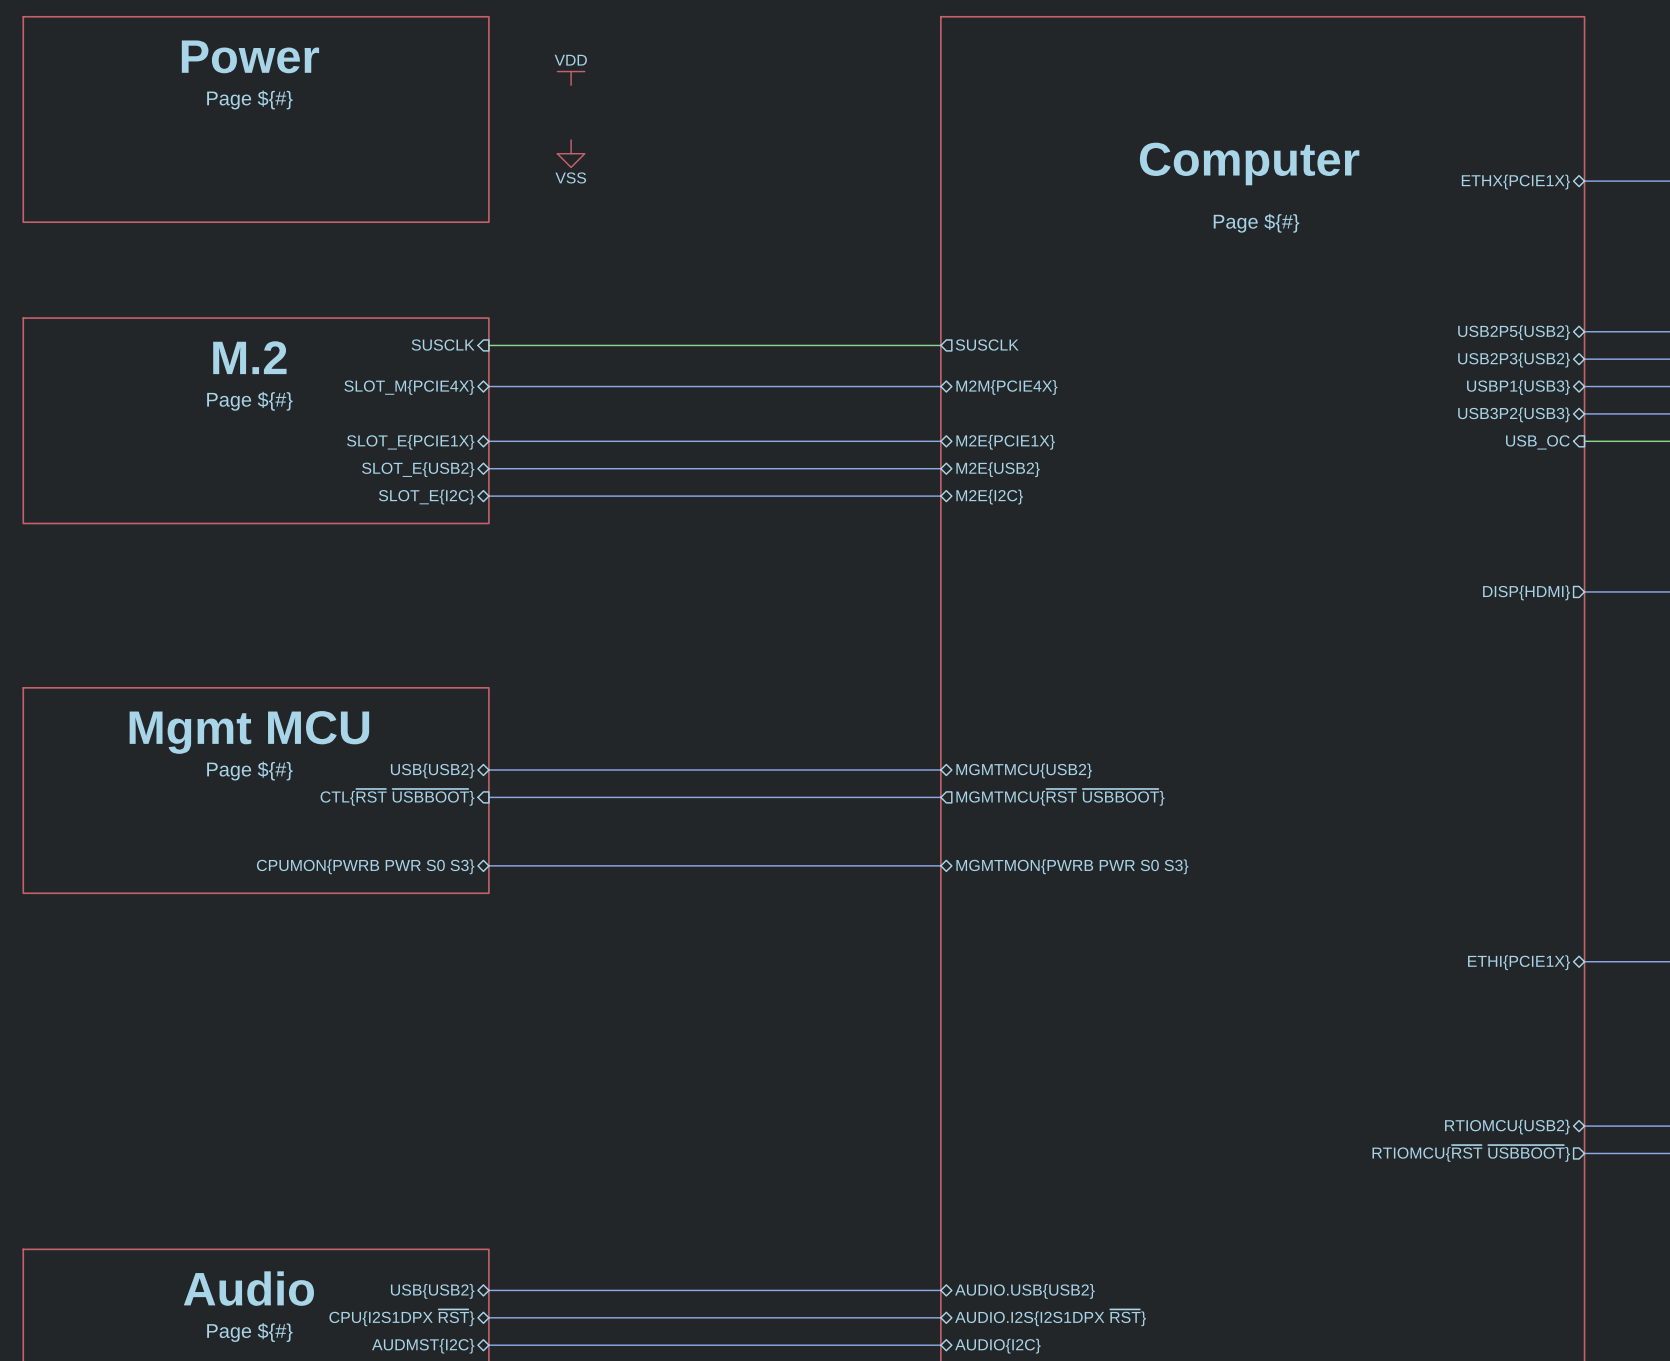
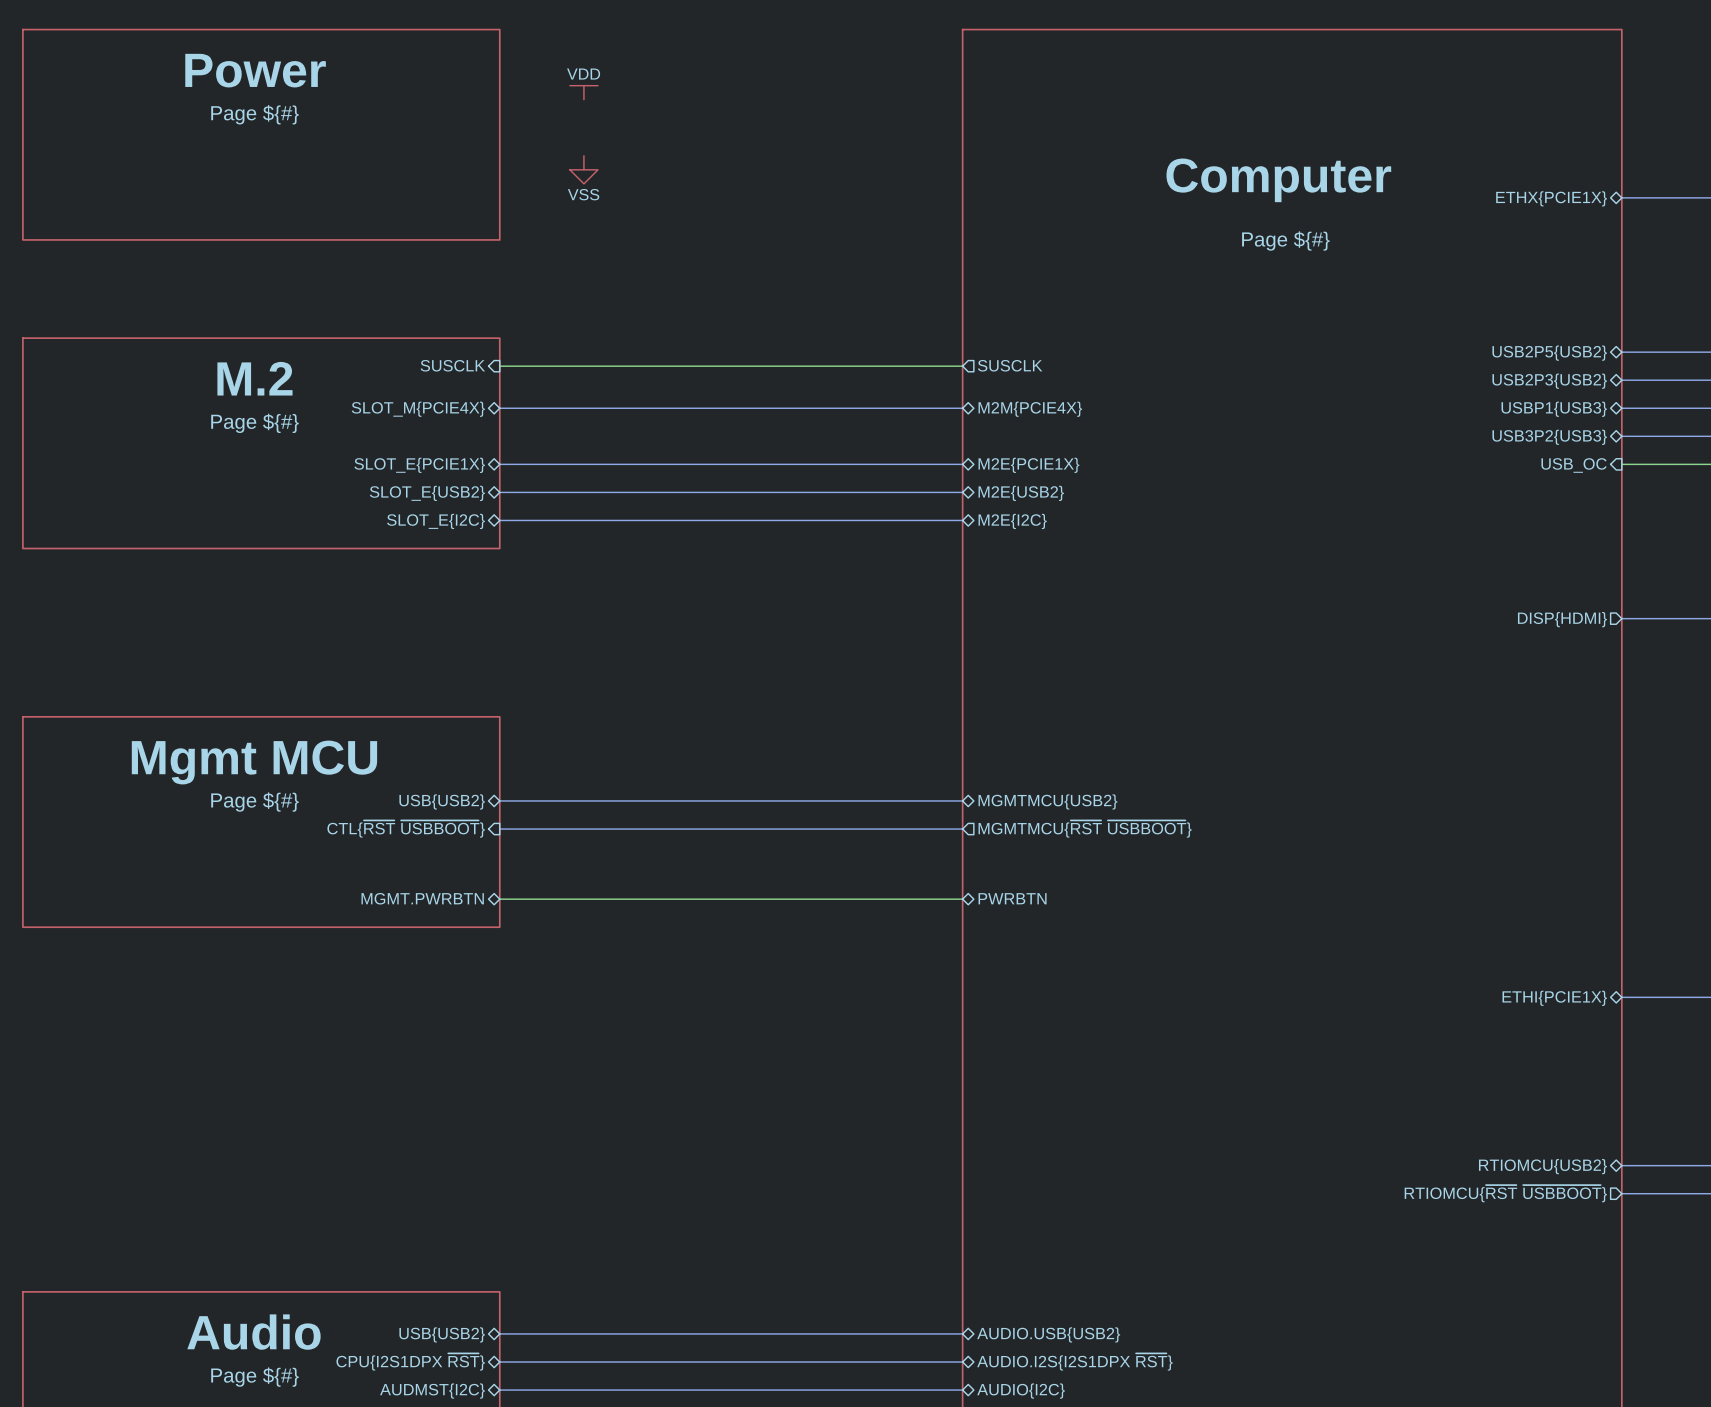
bus: (488, 865) (940, 865) -> none
sheet pin: CPUMON{PWRB PWR S0 S3} (365, 866) -> MGMT.PWRBTN (422, 898)
sheet pin: MGMTMON{PWRB PWR S0 S3} (1072, 866) -> PWRBTN (1012, 898)

